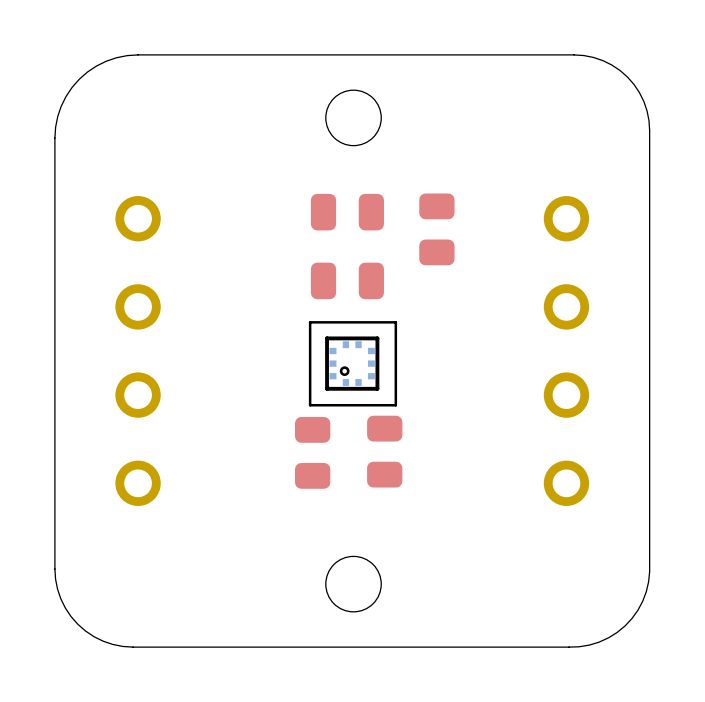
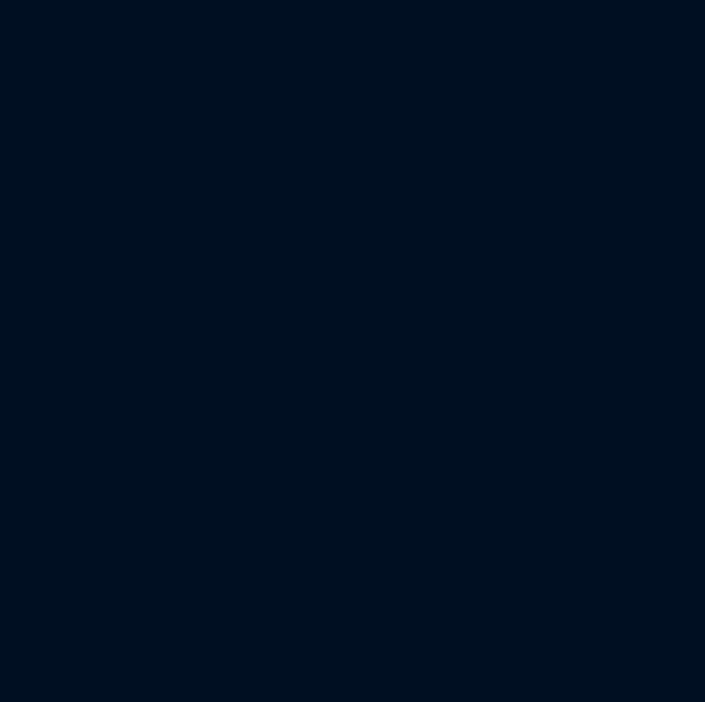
board edge: (574, 54) (138, 54) (106, 61) (87, 72) (72, 87) (61, 106) (54, 138) (54, 568) (57, 589) (65, 608) (85, 630) (103, 641) (133, 647) (568, 647) (599, 642) (617, 632) (631, 618) (642, 601) (649, 571) (648, 120) (639, 92) (627, 77) (602, 60) (574, 54) -> none
round board edge: [325, 89, 382, 147] -> none
part: (347, 212) -> none
part: (436, 229) -> none
part: (347, 280) -> none
line: (395, 322) (310, 322) (310, 405) (395, 405) (395, 322) -> none
part: (138, 351) -> none
part: (566, 351) -> none
part: (352, 363) -> none
part: (384, 451) -> none
part: (312, 452) -> none
round board edge: [325, 555, 382, 613] -> none

